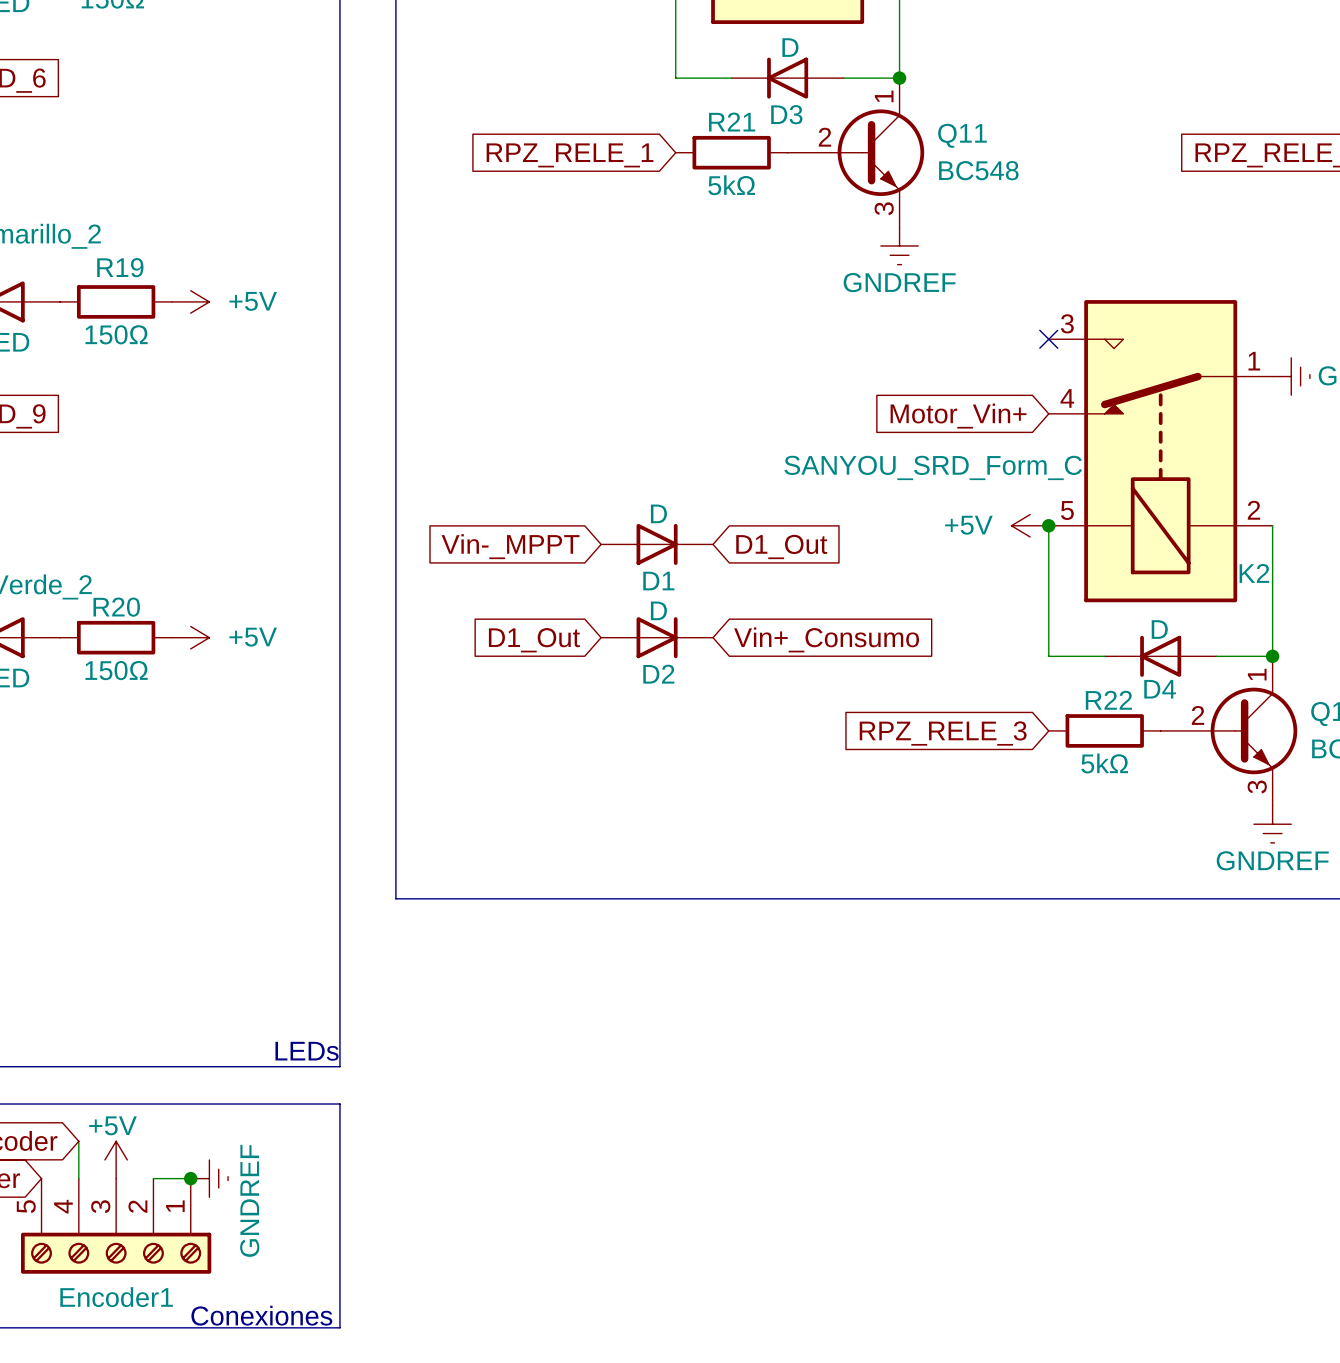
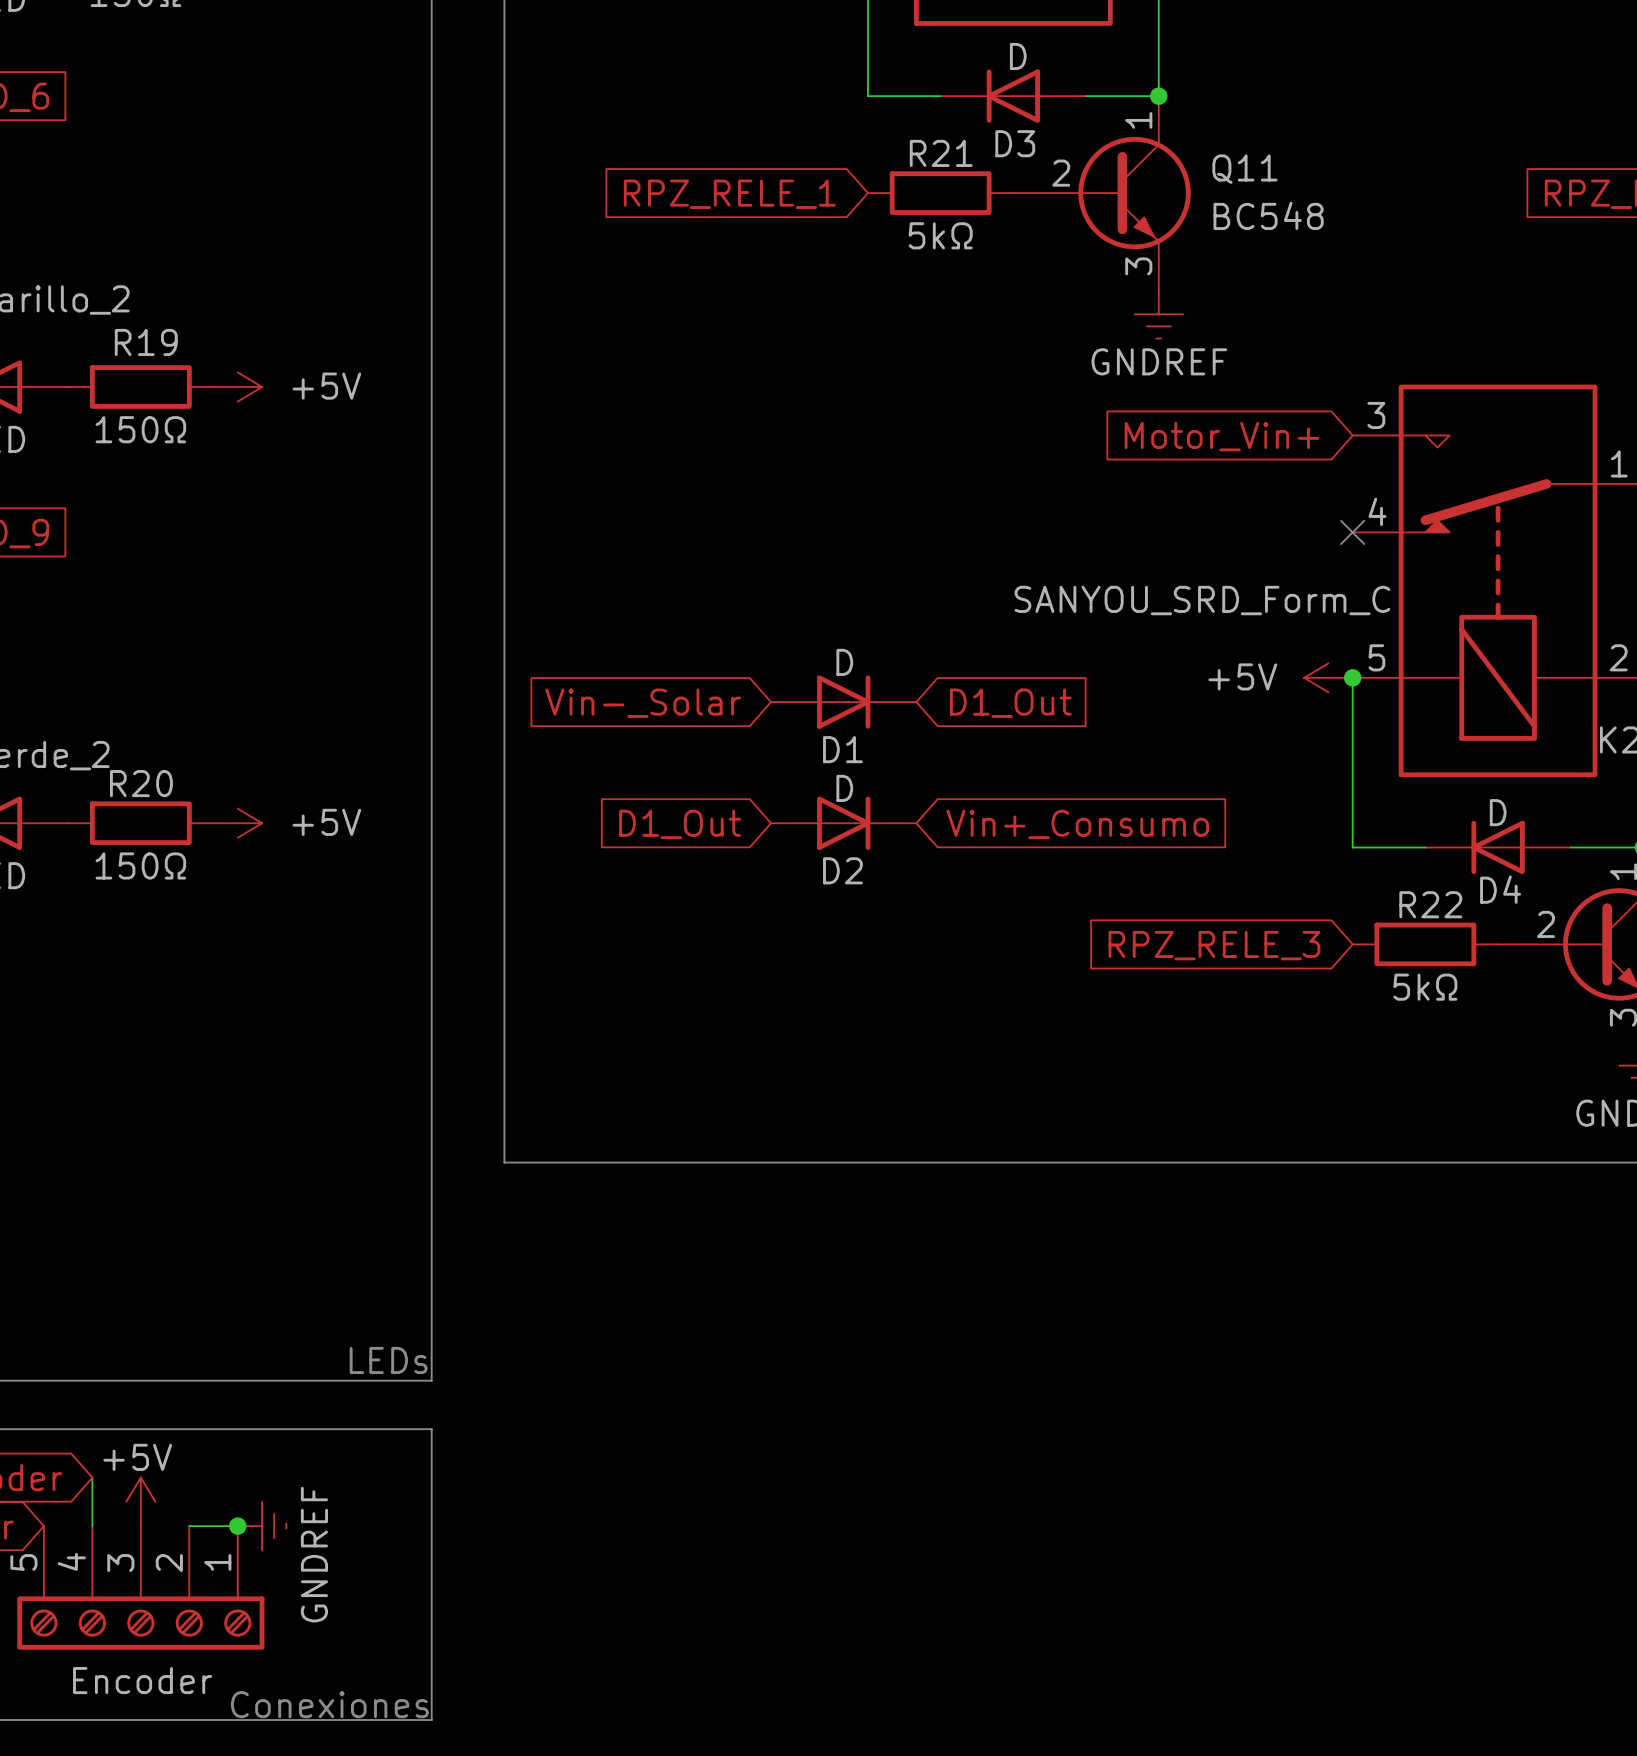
no-connect mark position: (1048, 339) -> (1352, 532)
global label position: Motor_Vin+ (958, 416) -> Motor_Vin+ (1221, 436)
global label: Vin-_MPPT (510, 546) -> Vin-_Solar (643, 703)
Encoder1 name: Encoder1 (116, 1297) -> Encoder (142, 1680)

